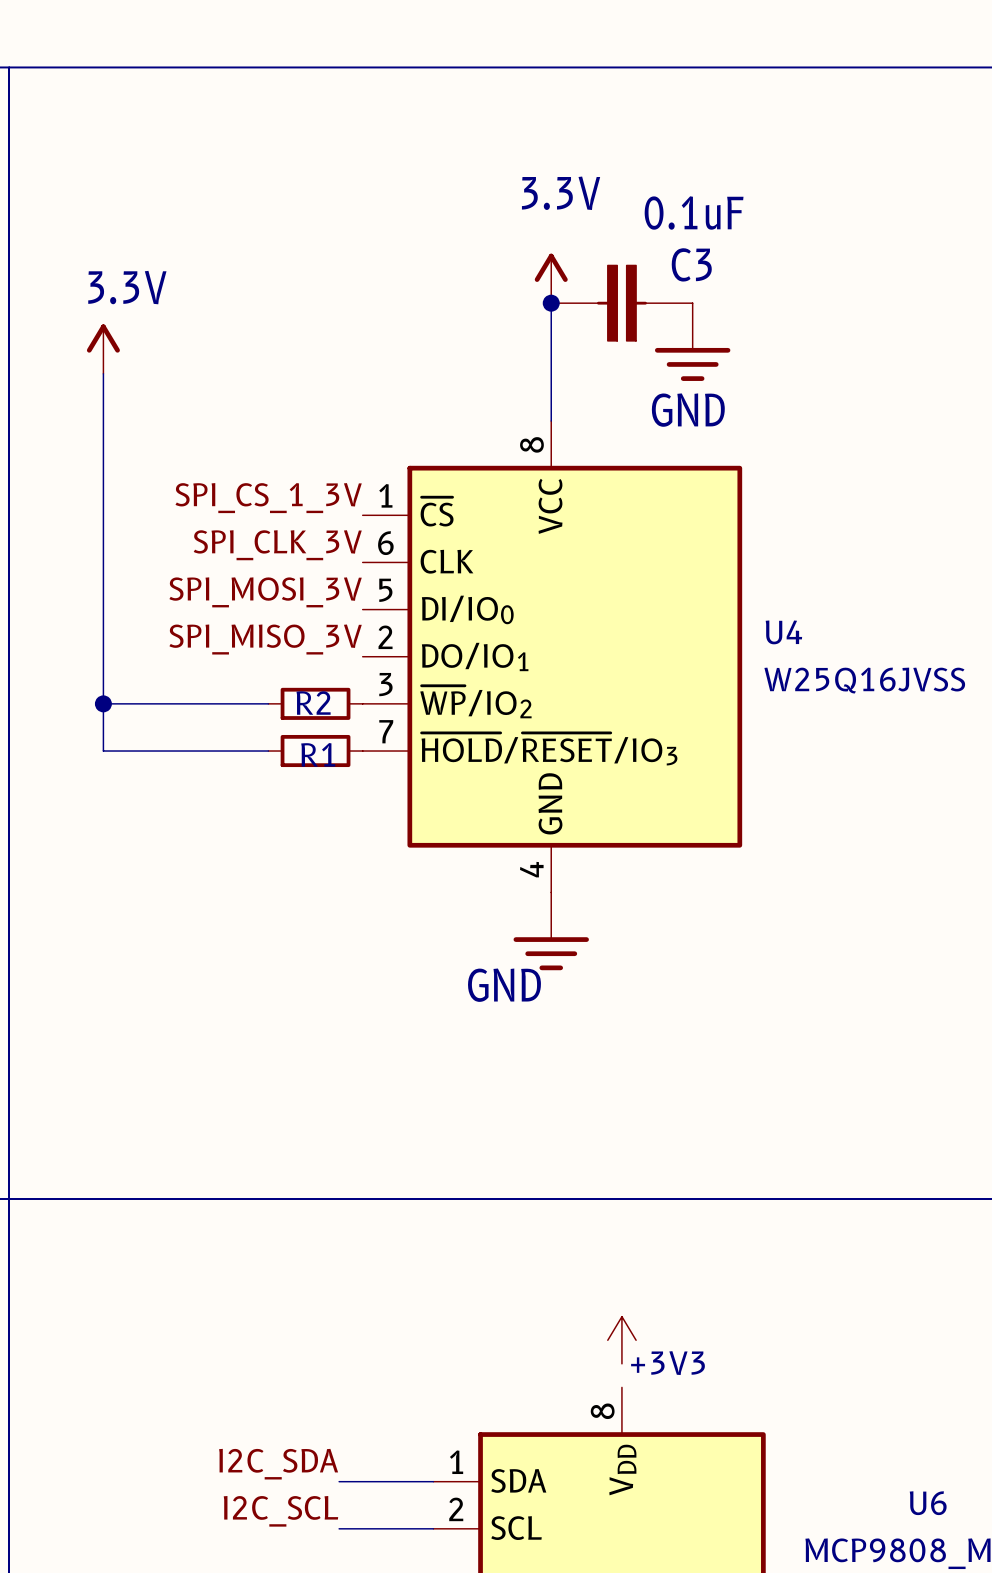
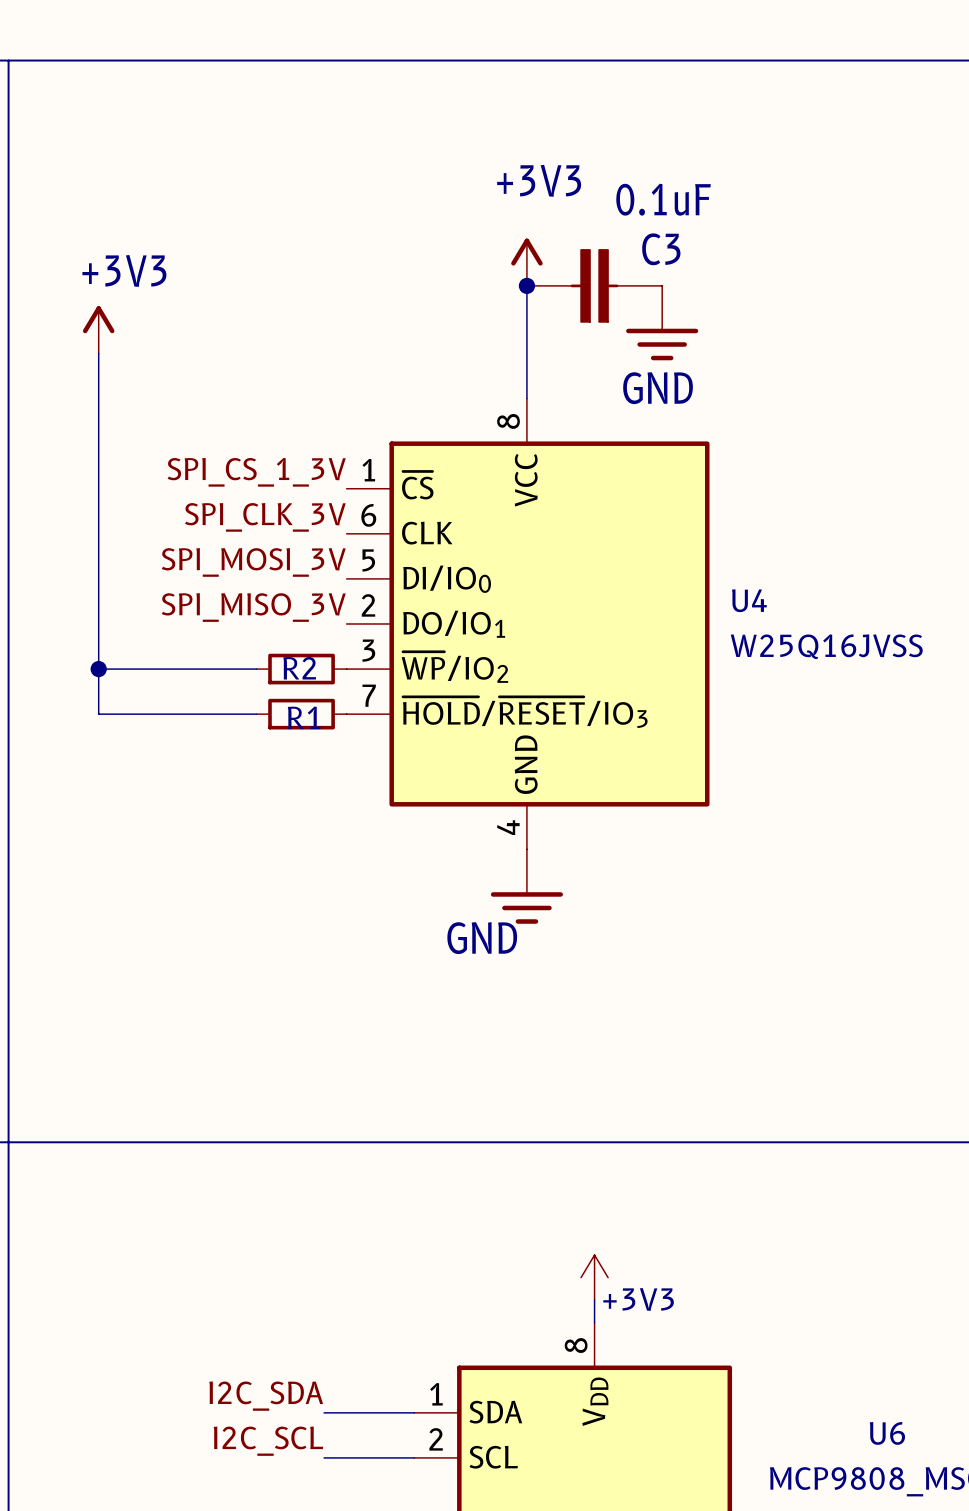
power symbol: 3.3V (551, 278) -> +3V3 (526, 262)
power symbol: 3.3V (103, 349) -> +3V3 (98, 329)
wire: none -> (594, 1300) (594, 1322)

